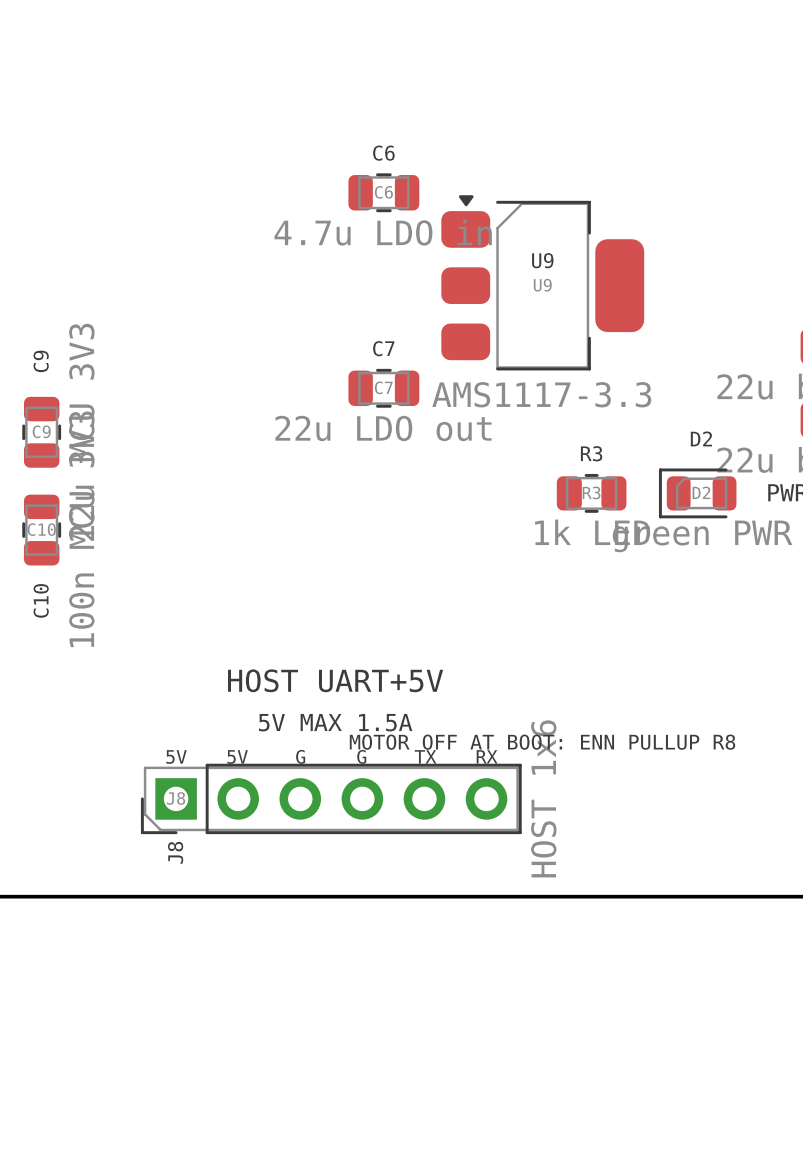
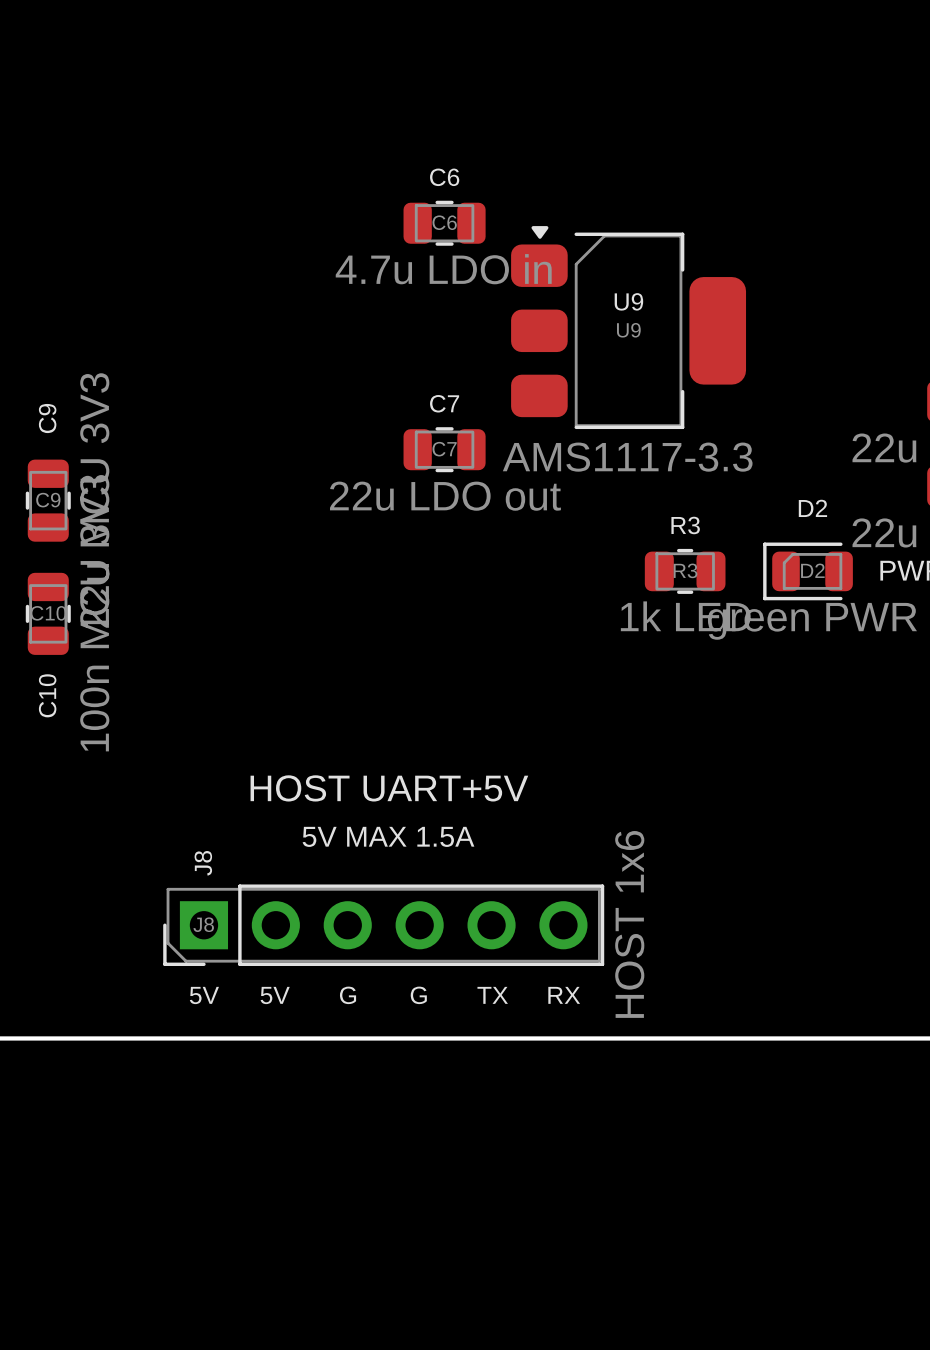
text: MOTOR OFF AT BOOT: ENN PULLUP R8 (542, 742) -> none
text: G (300, 756) -> none
text: G (361, 756) -> none
text position: TX (425, 756) -> TX (492, 995)
text position: RX (487, 756) -> RX (564, 995)
text: 5V (176, 757) -> none
text: 5V (237, 757) -> none
J8 name position: J8 (175, 852) -> J8 (203, 863)
text: none -> 5V (204, 995)
text: none -> 5V (275, 995)
text: none -> G (348, 995)
text: none -> G (418, 995)

